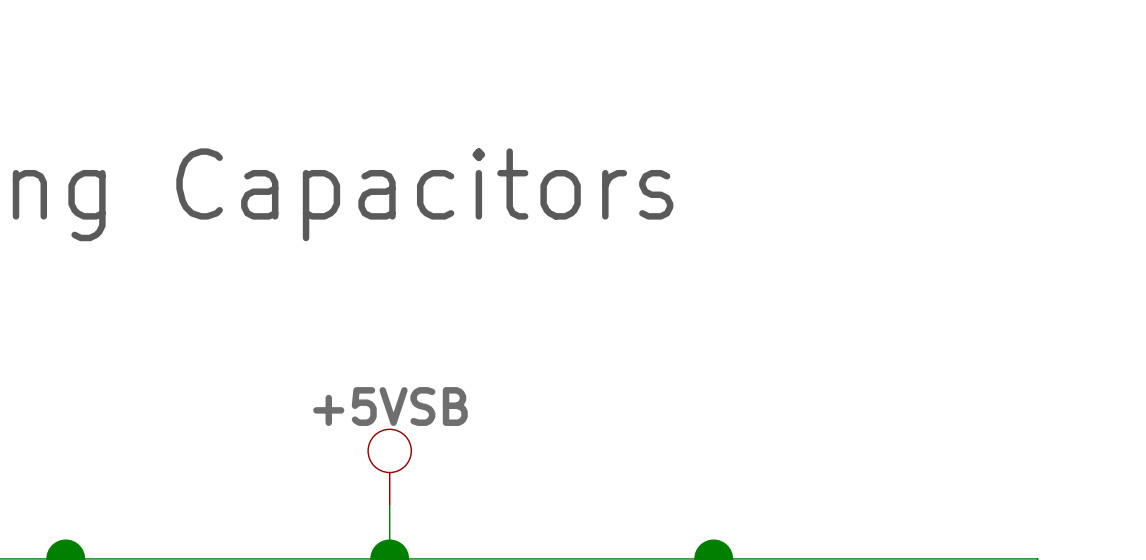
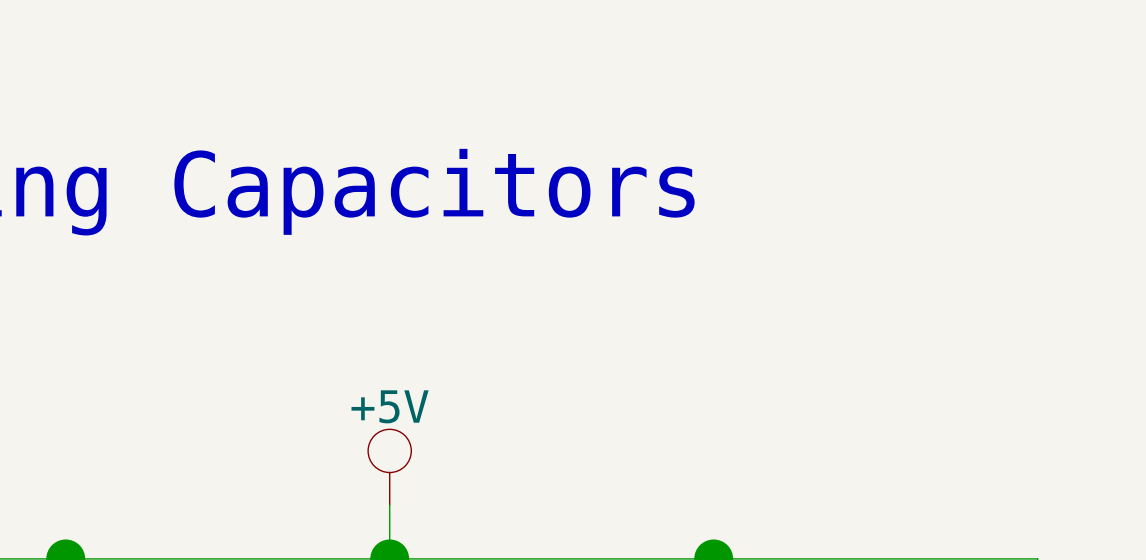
power symbol: +5VSB (389, 467) -> +5V (389, 467)

